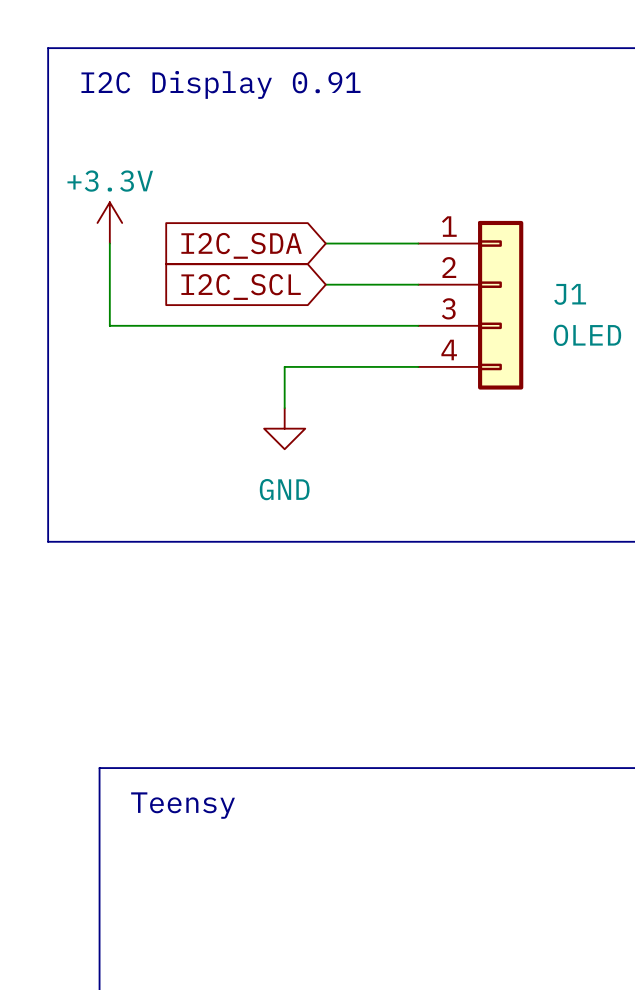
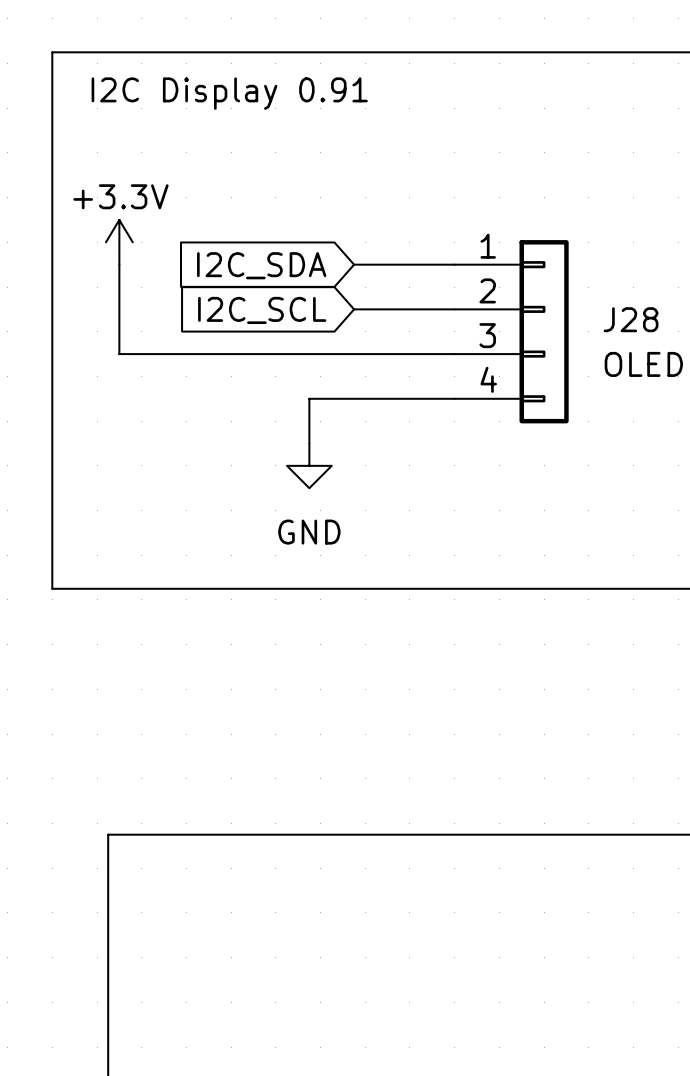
J1 name: J1 (570, 294) -> J28 (631, 319)
text: Teensy (183, 805) -> none

